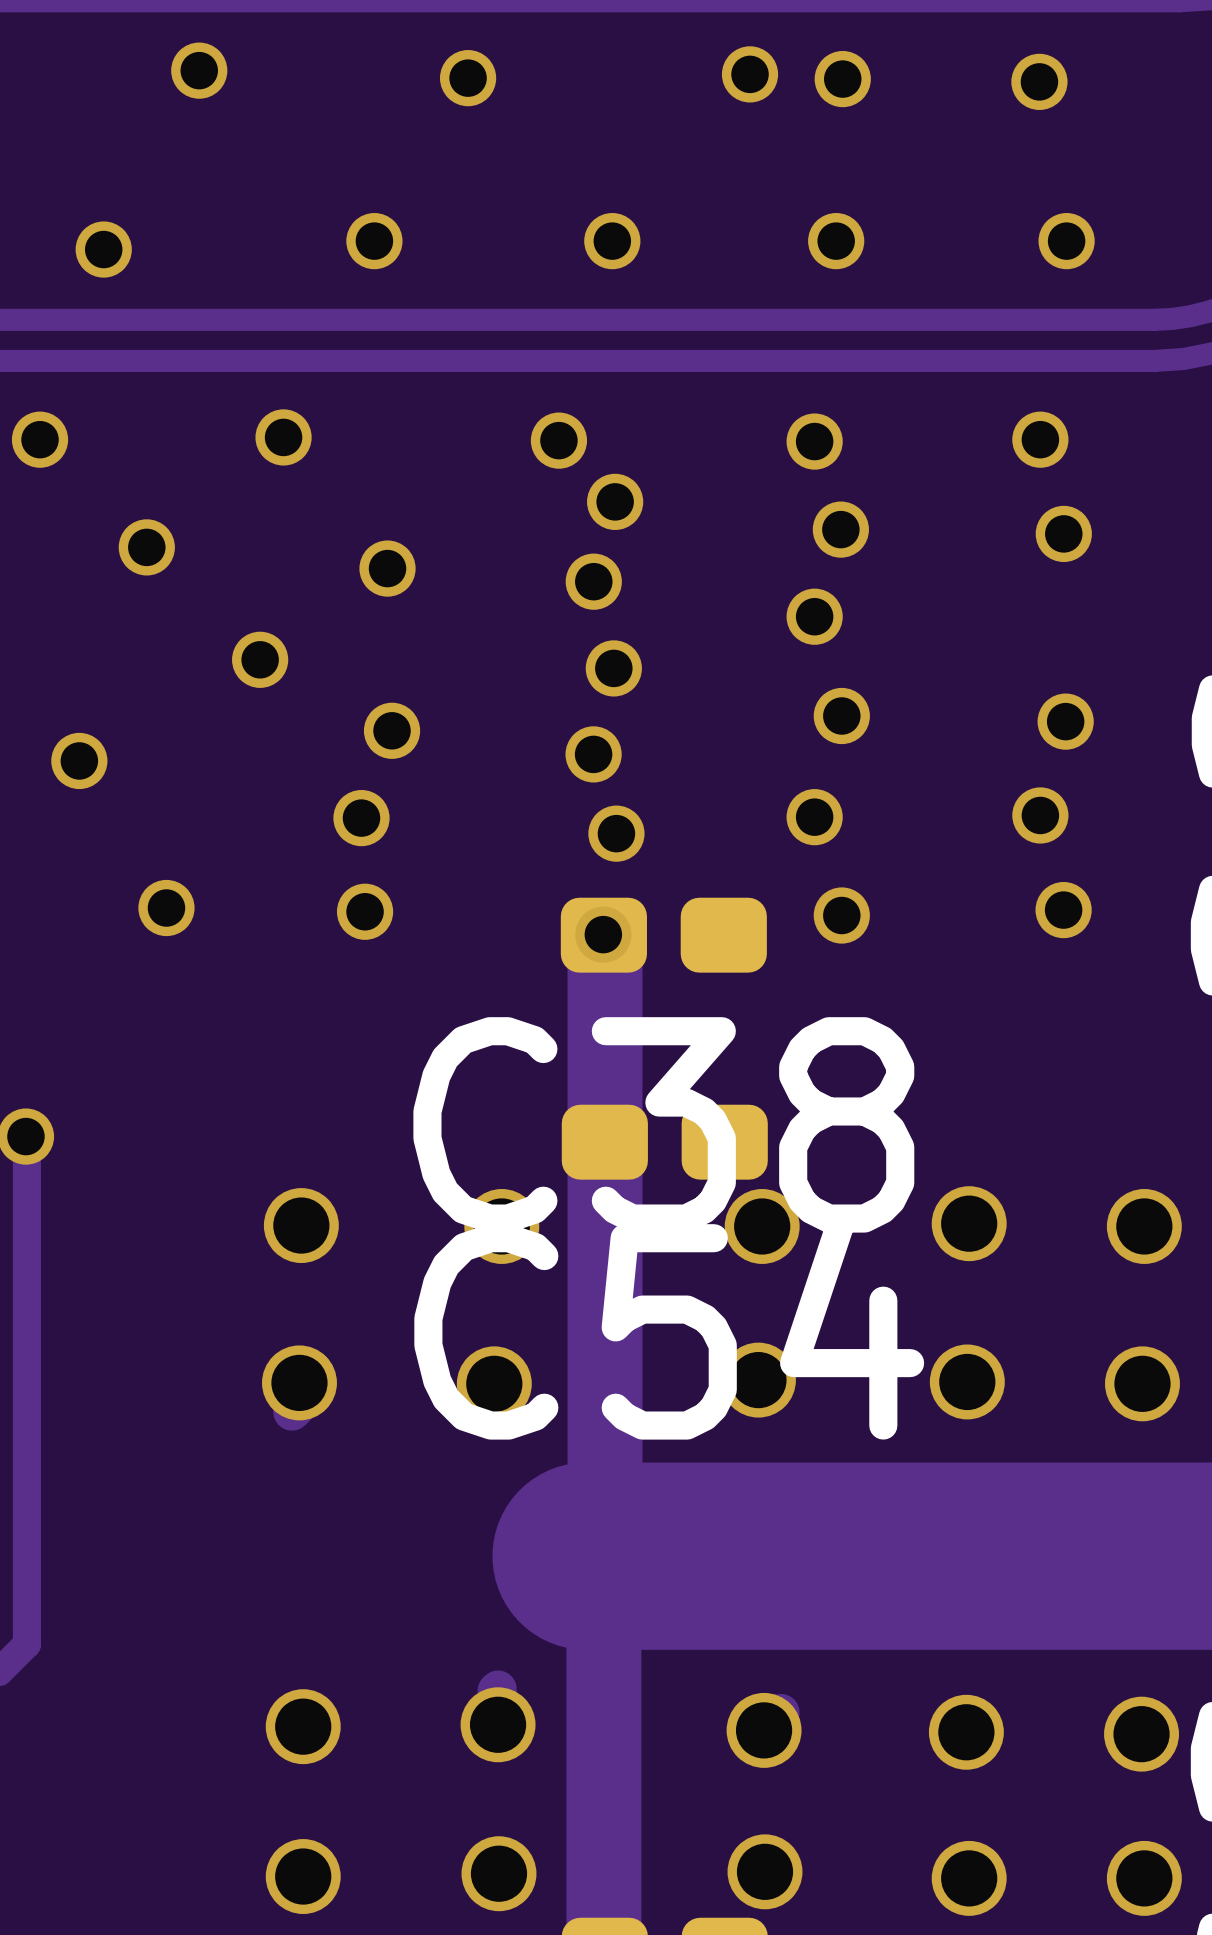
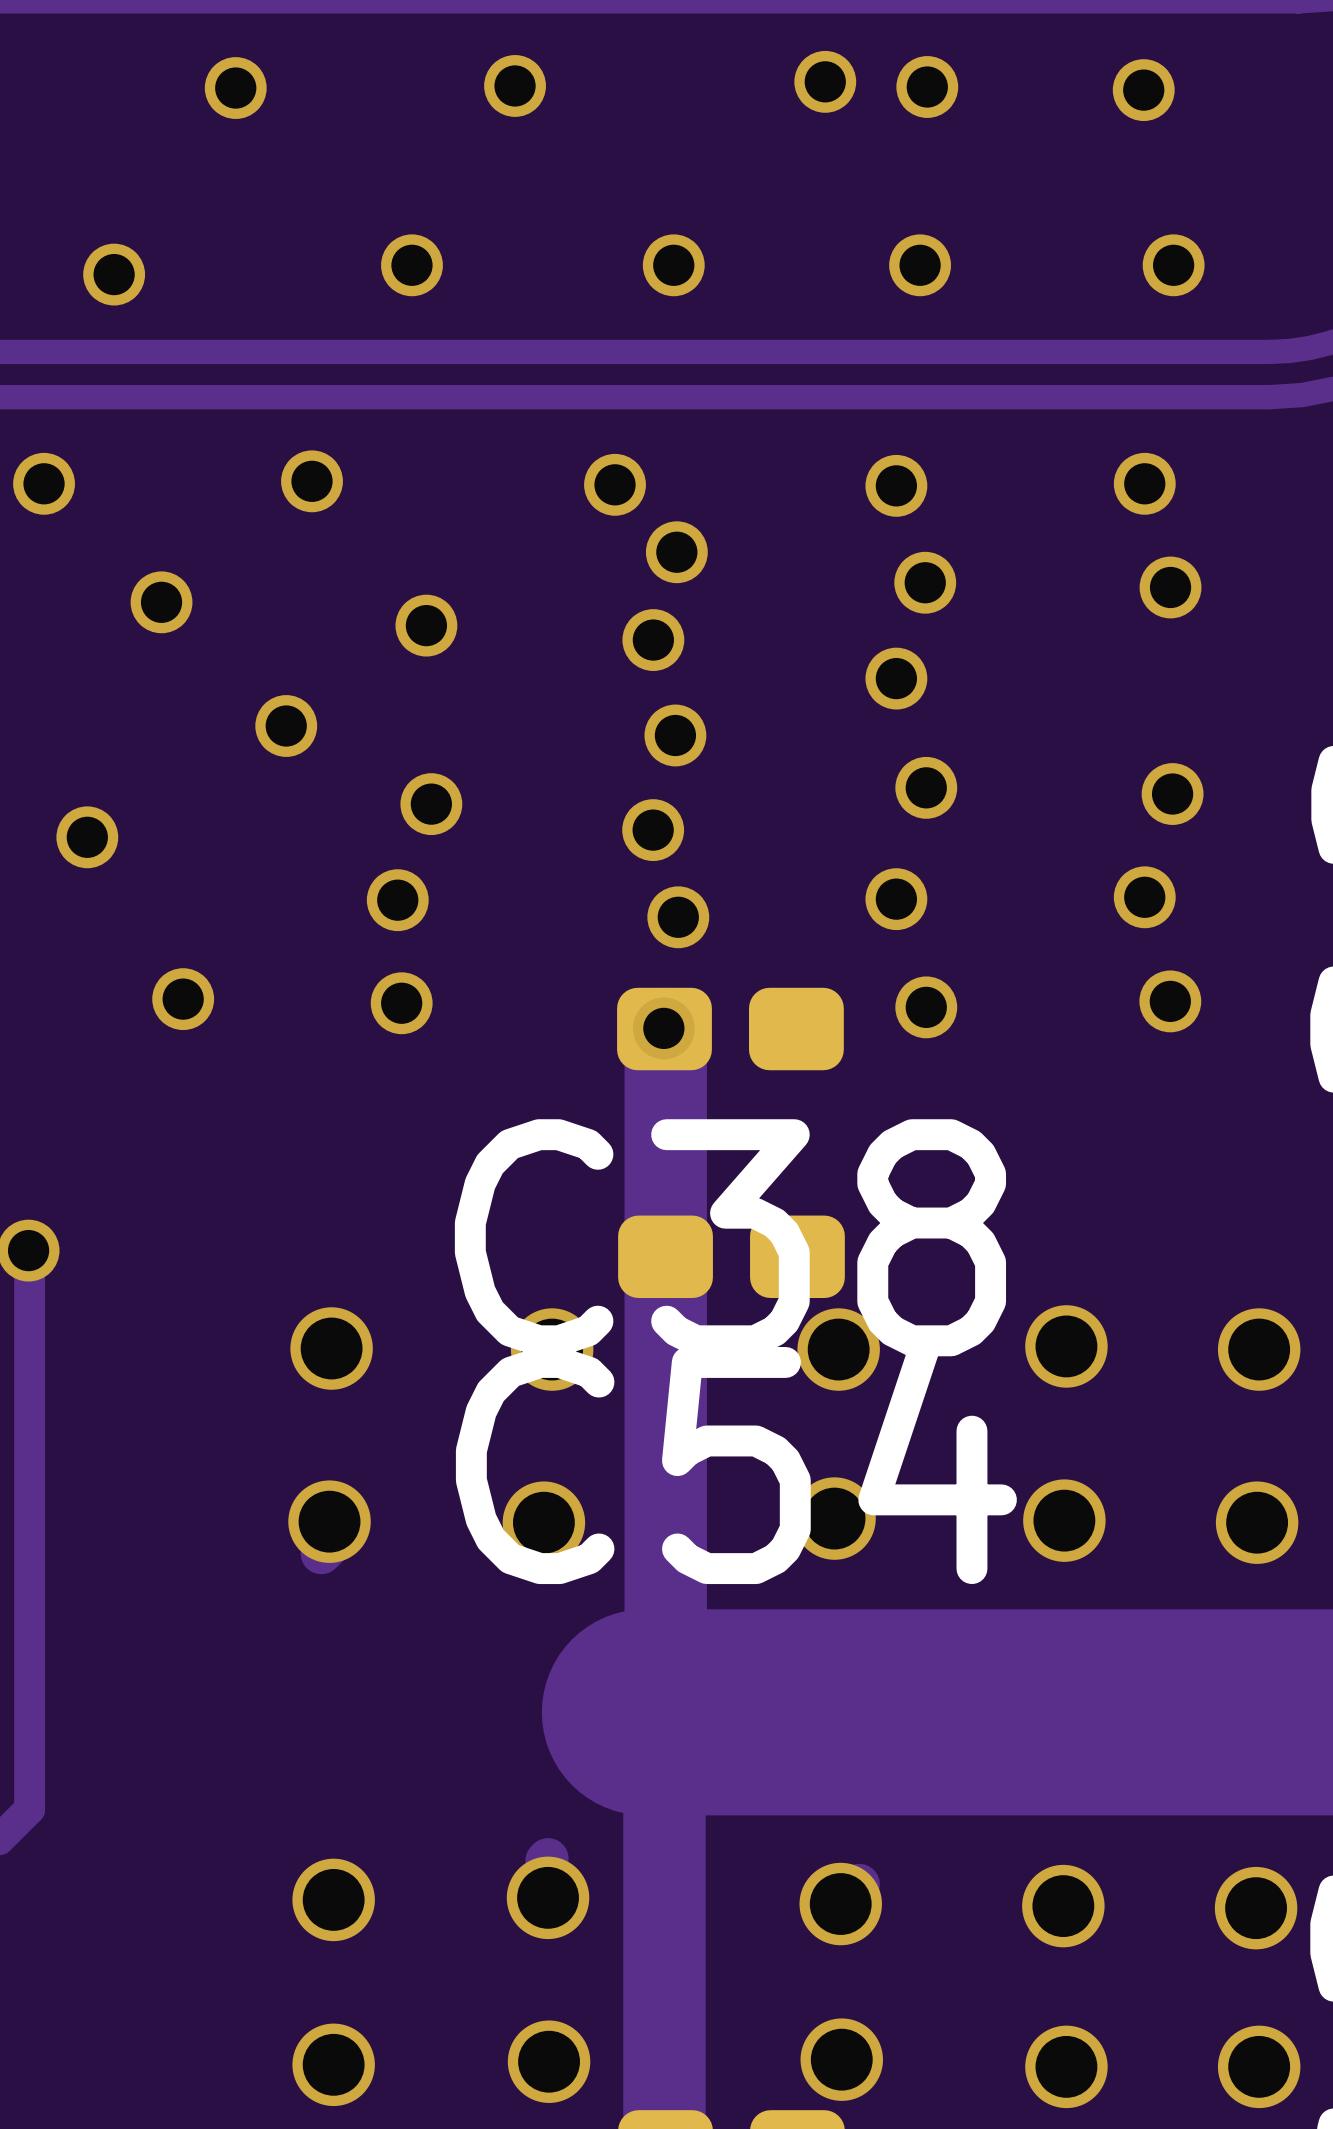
via position: (199, 70) -> (235, 88)

